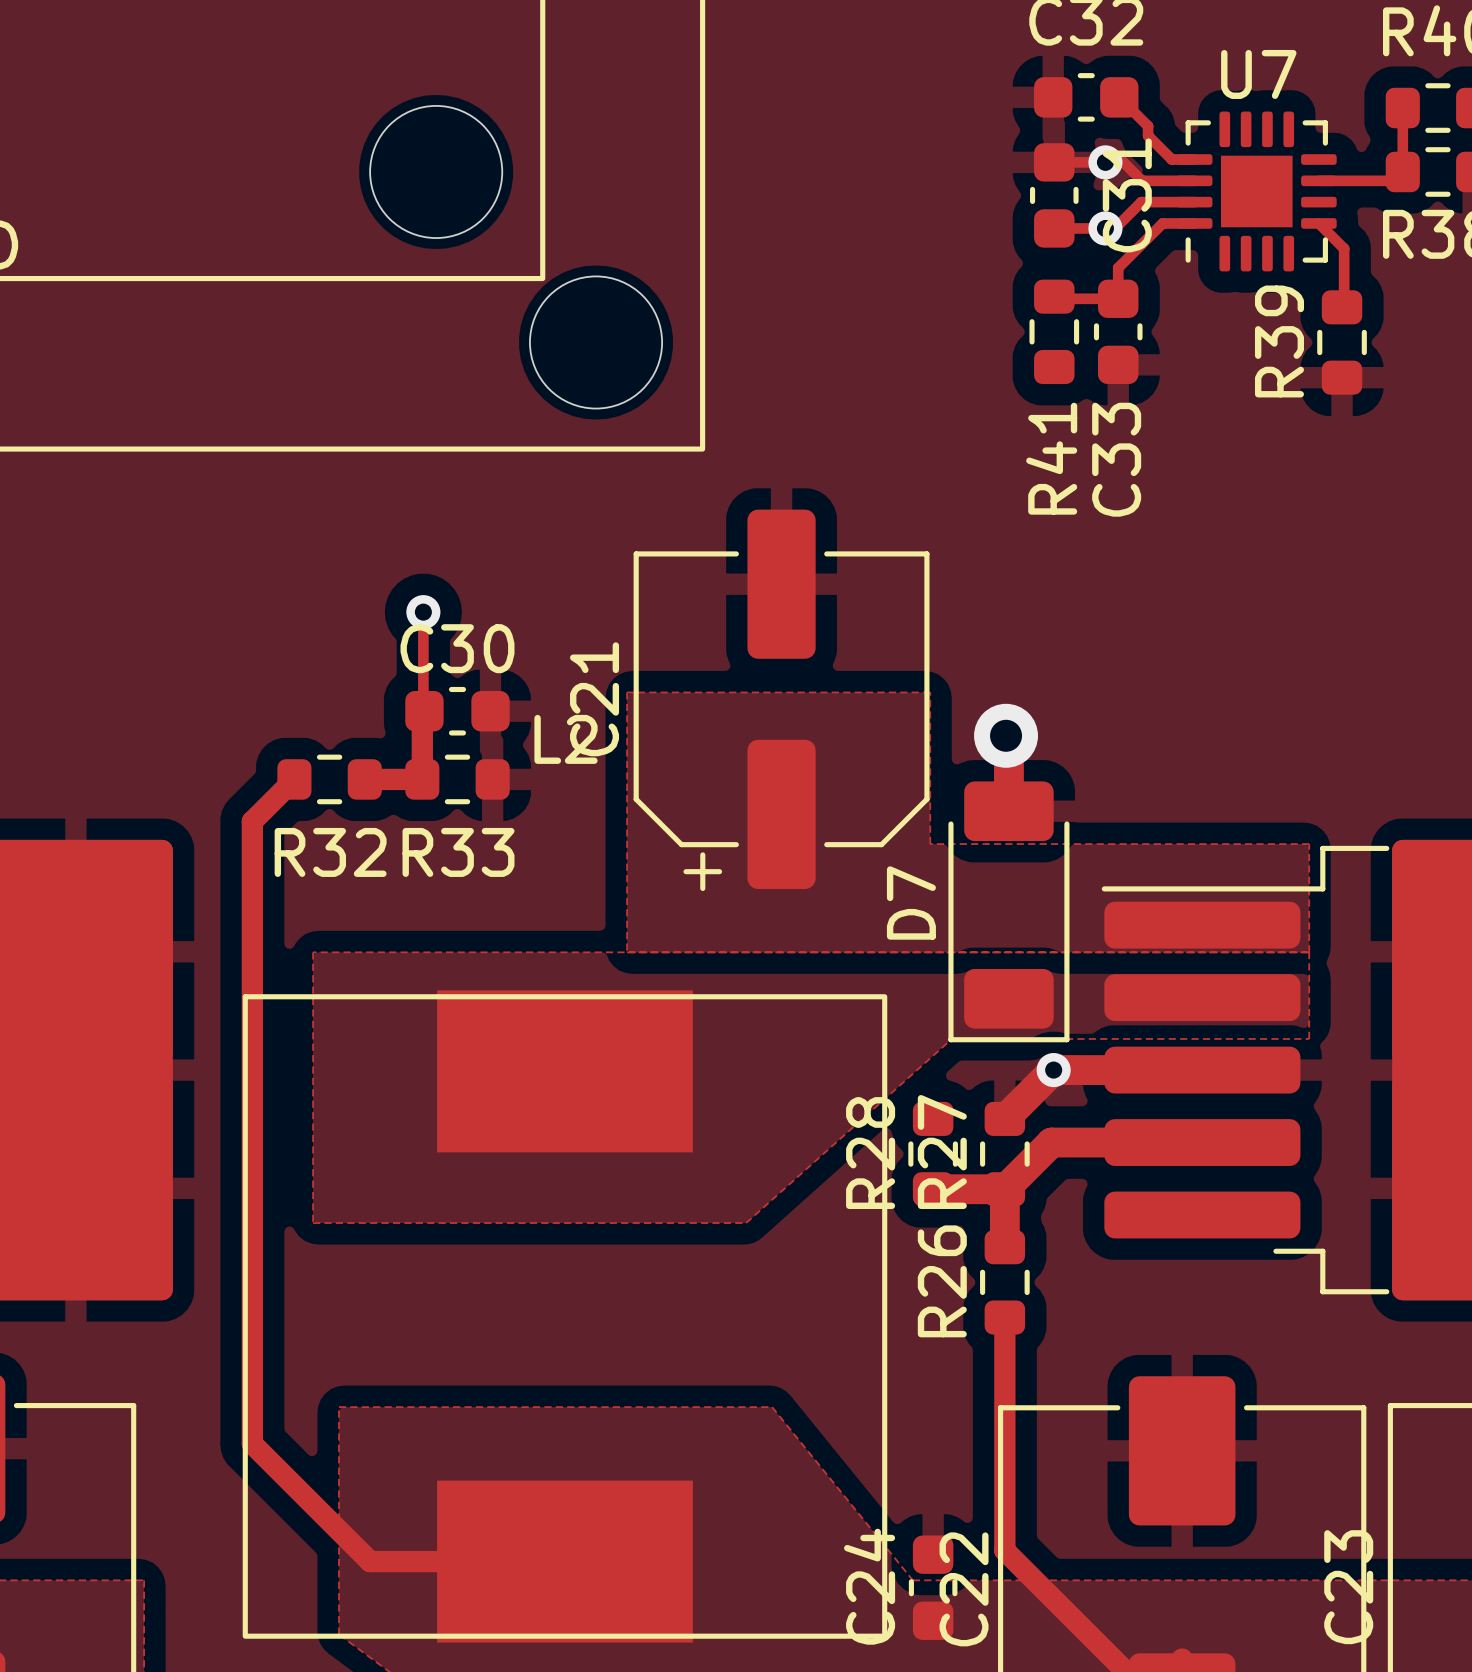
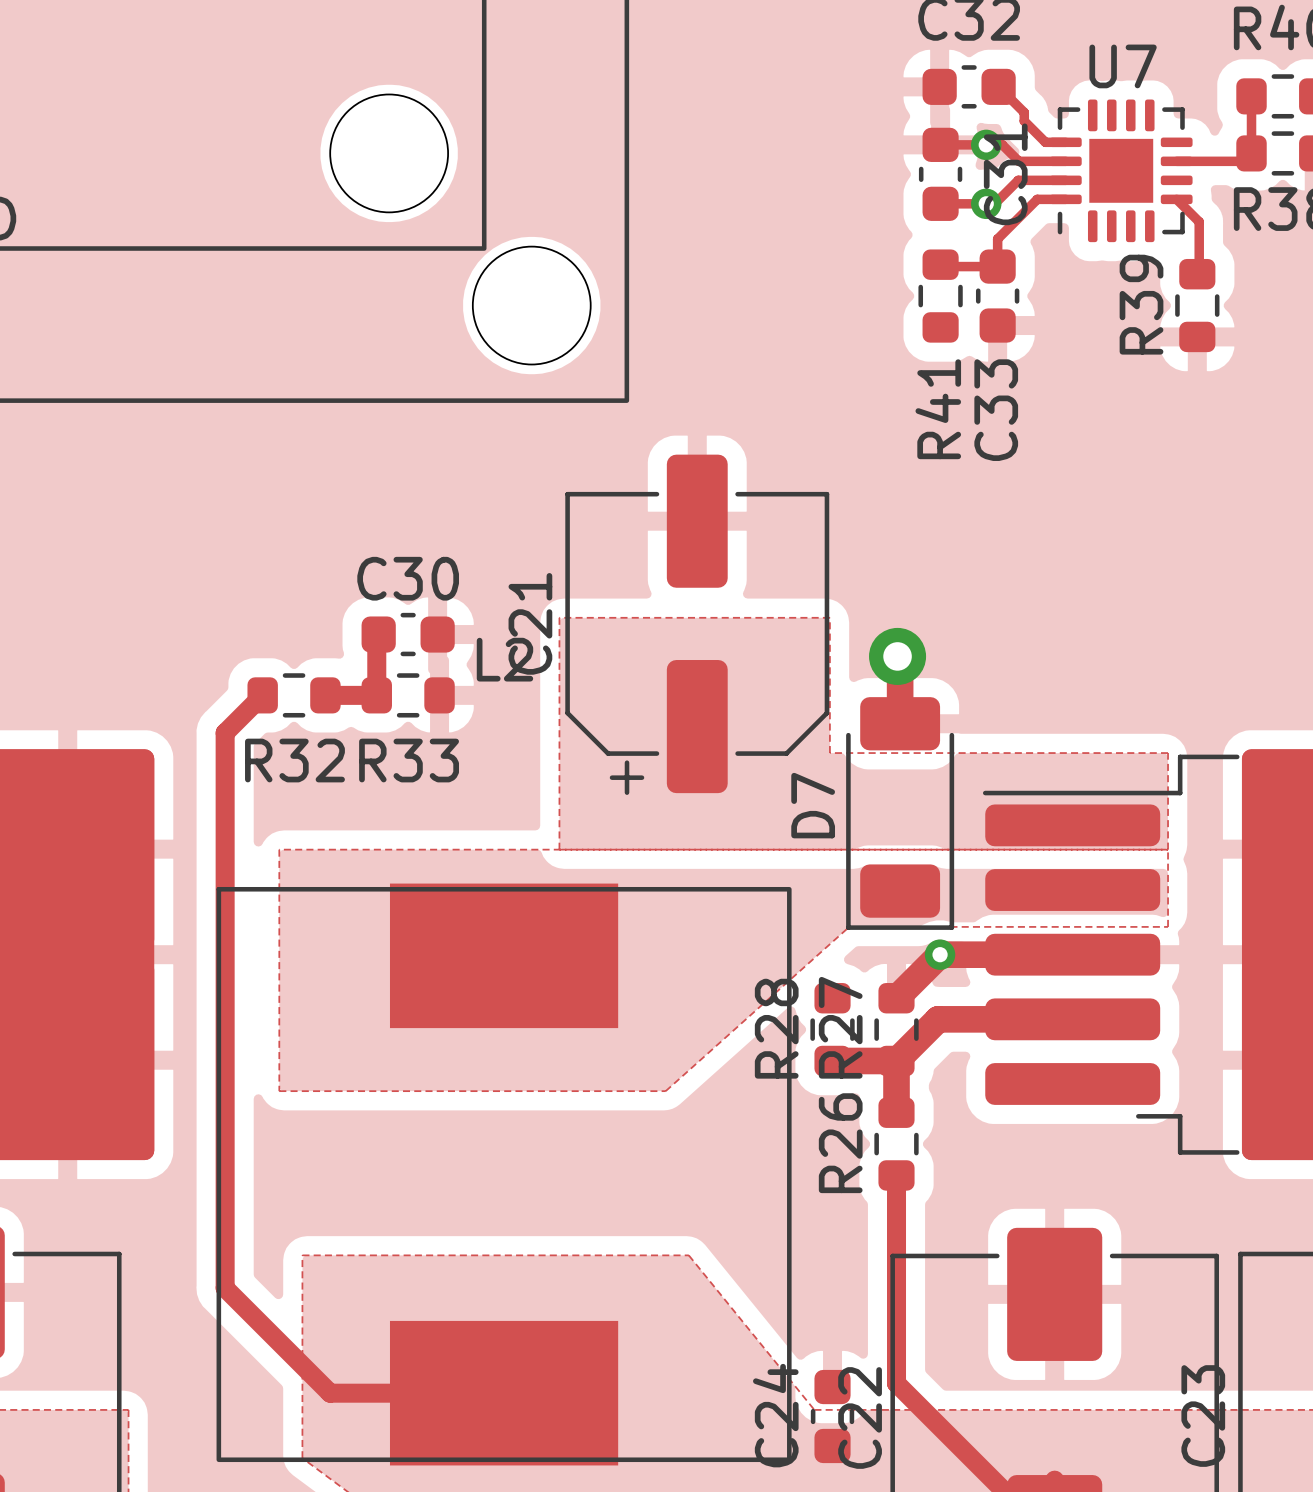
track: (423, 612) (424, 711) -> none
via: (423, 612) -> none

